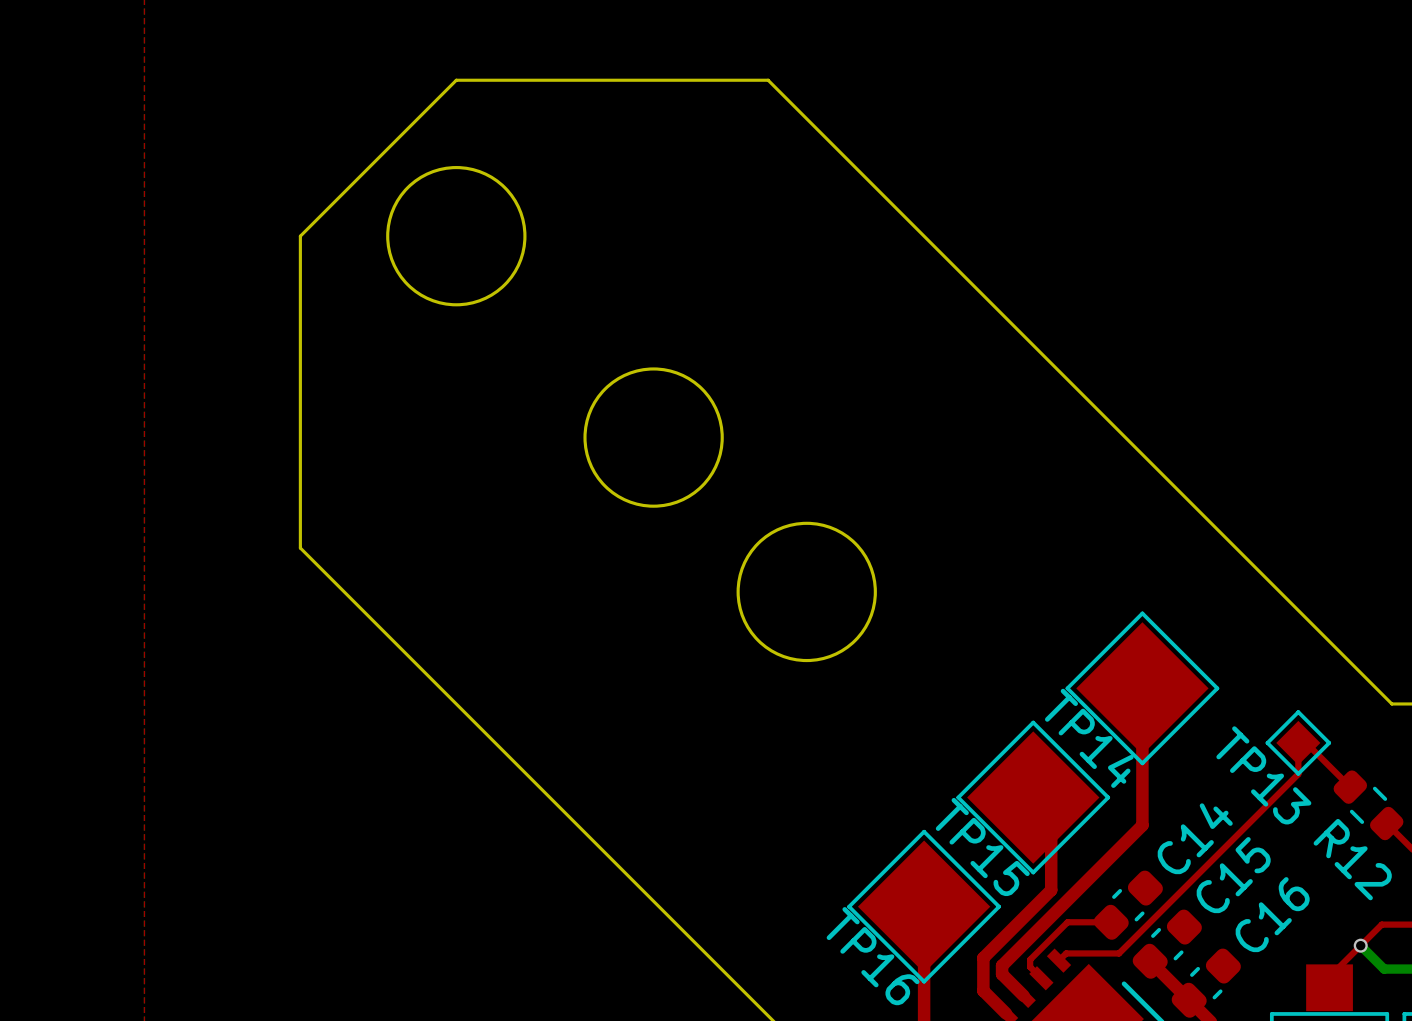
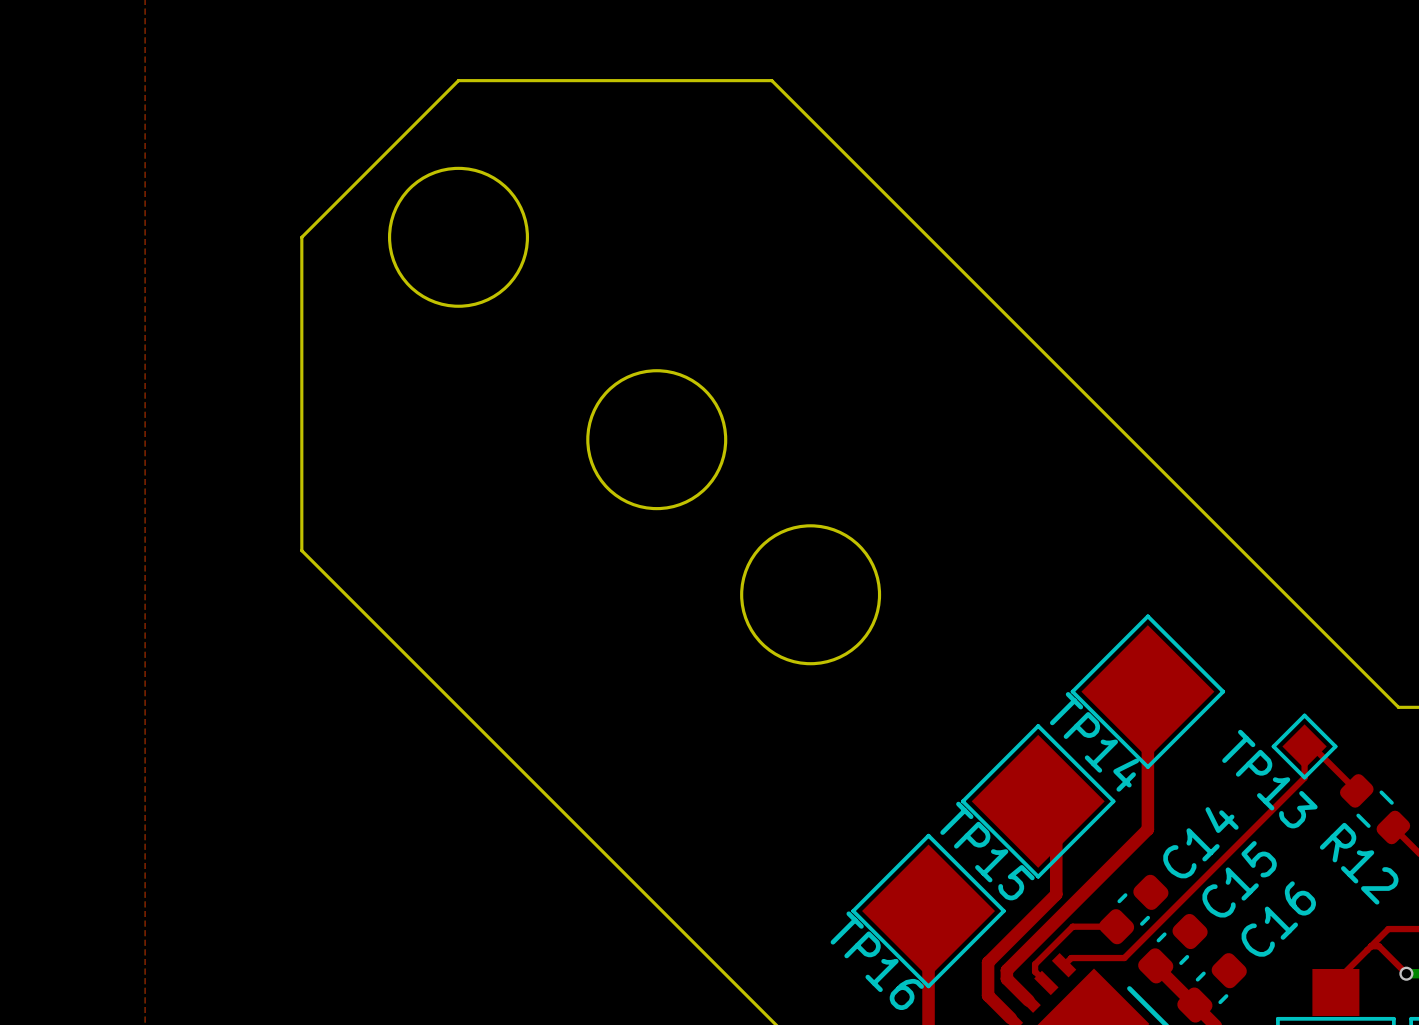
top track: none -> (1371, 946) (1378, 946) (1406, 973)
bottom track: (1360, 945) (1384, 969) (1399, 969) -> none
via position: (1360, 945) -> (1406, 973)

